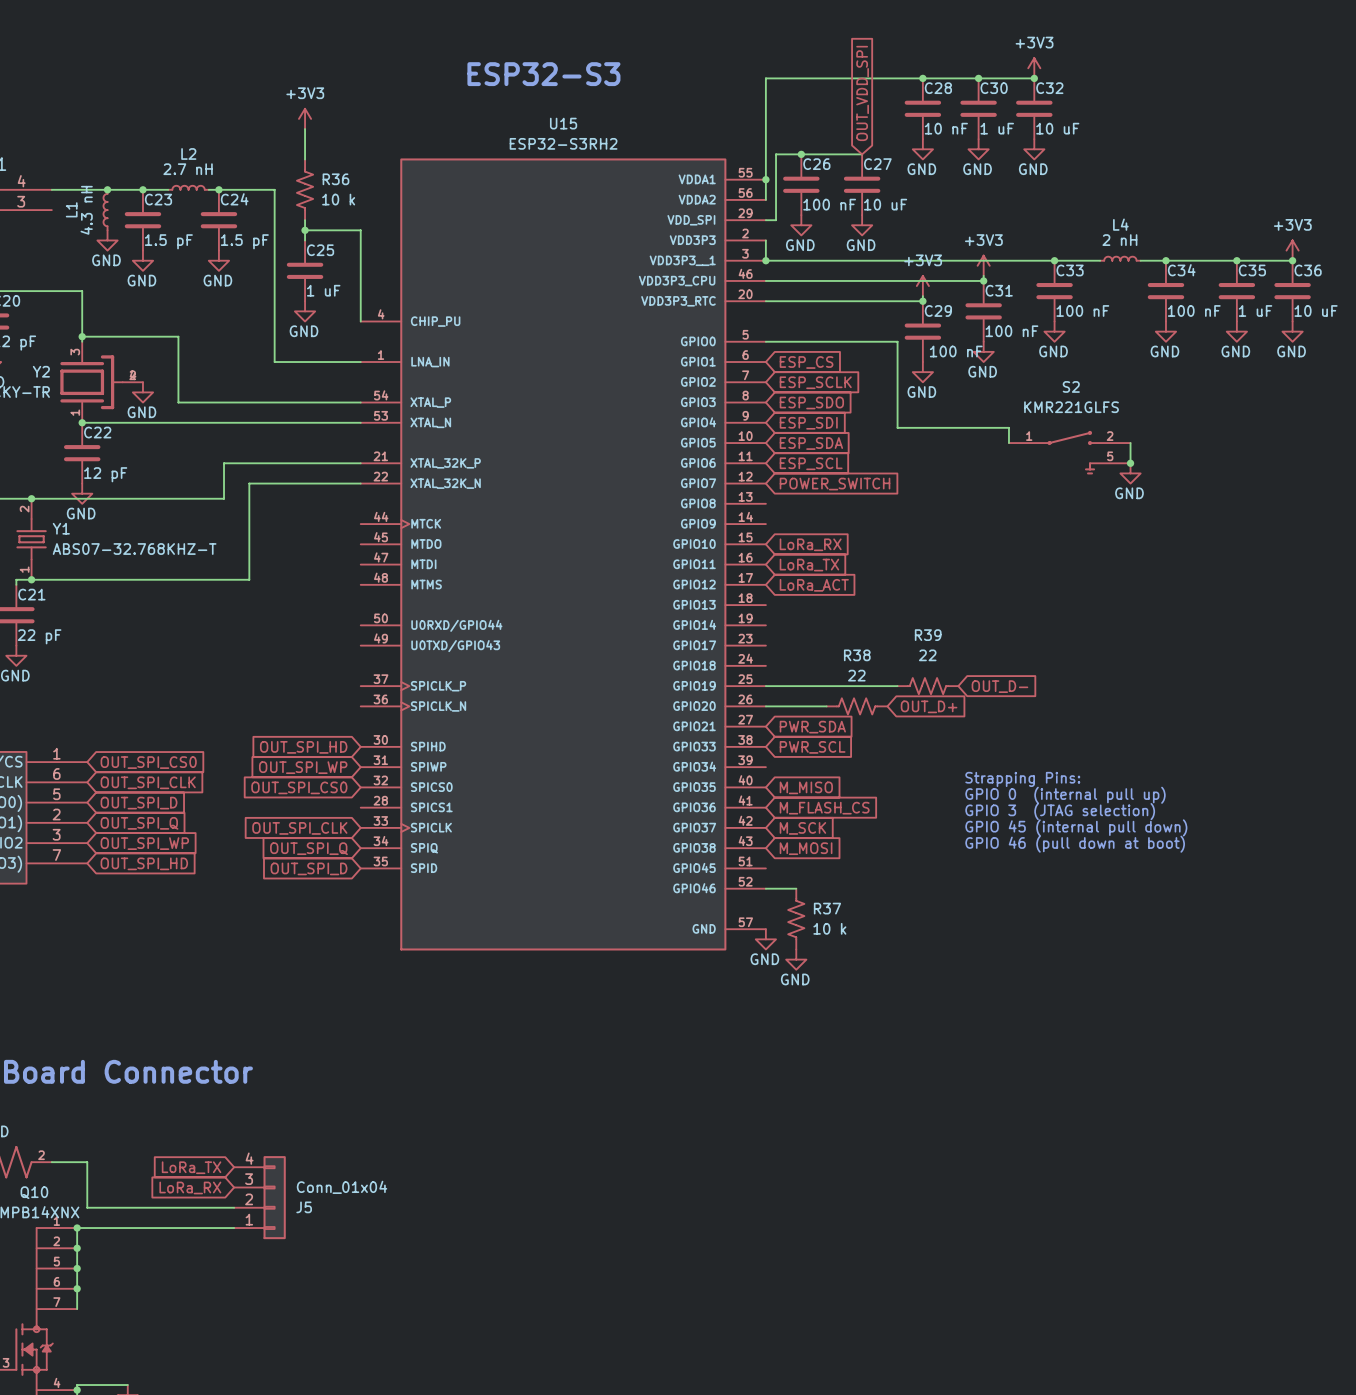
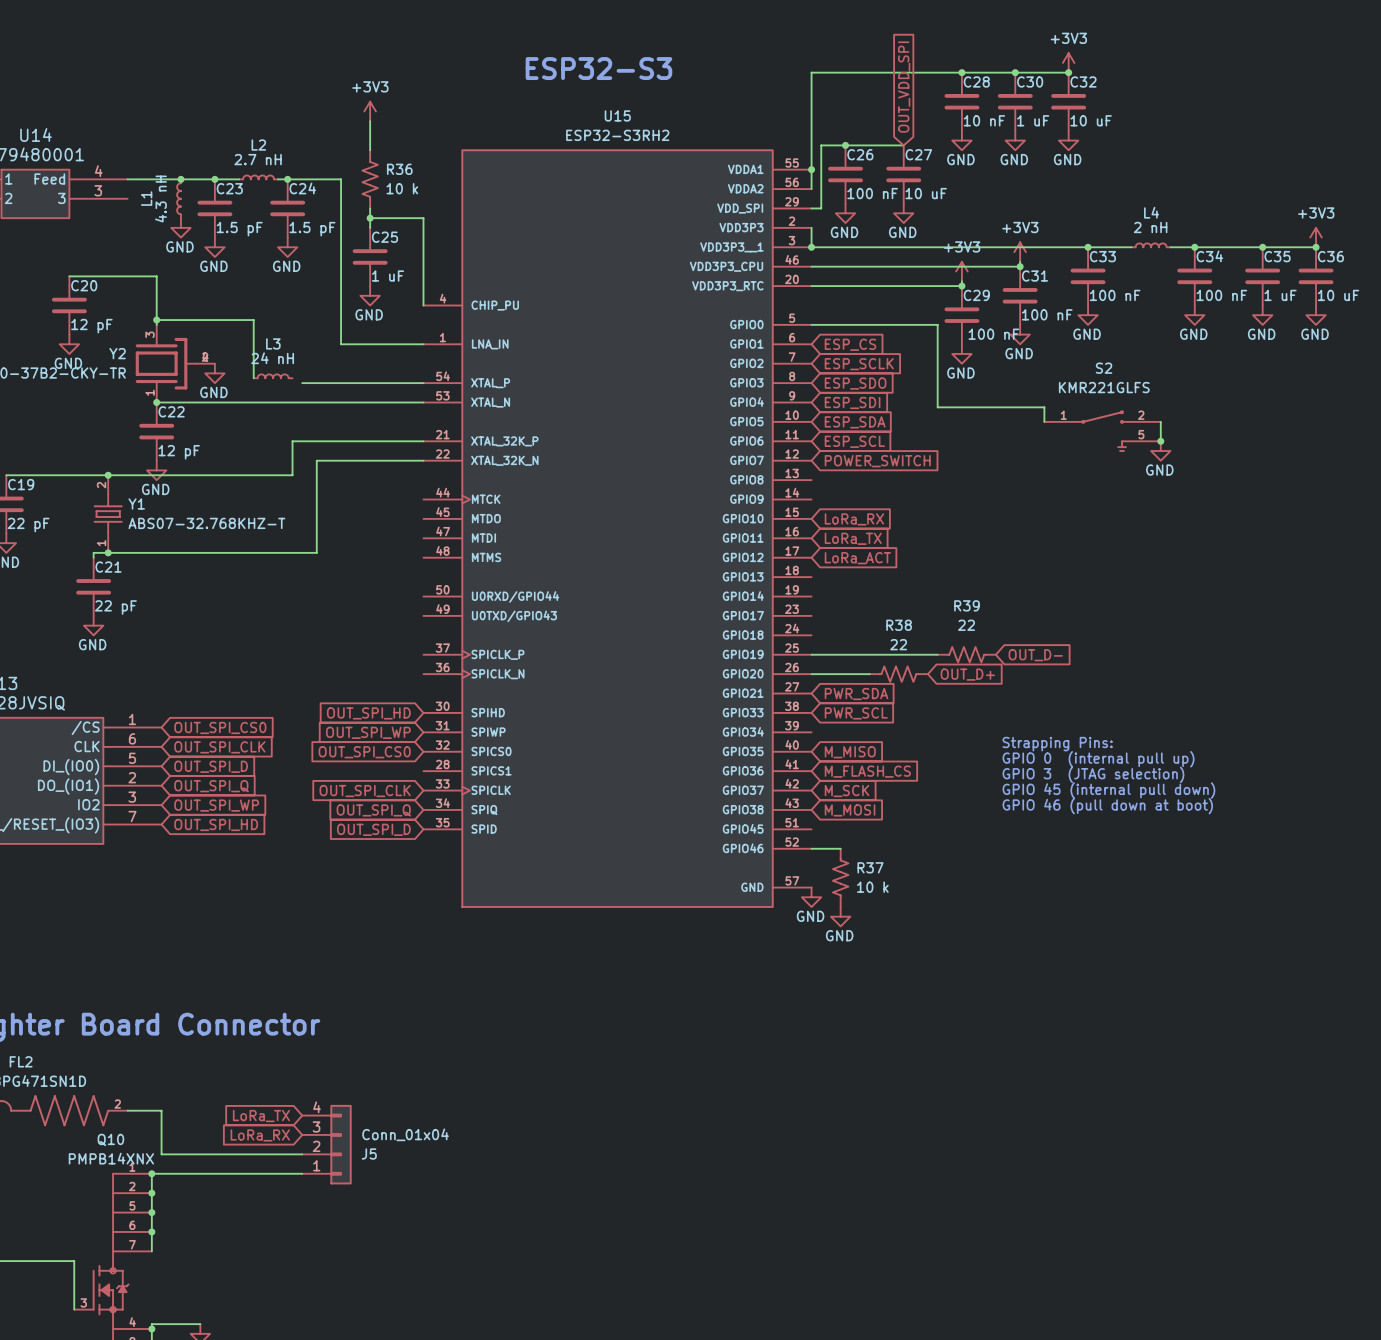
wire: (178, 336) (178, 402) (234, 402) -> (248, 320) (253, 320) (253, 378)
L3: none -> 24 nH (273, 376)

